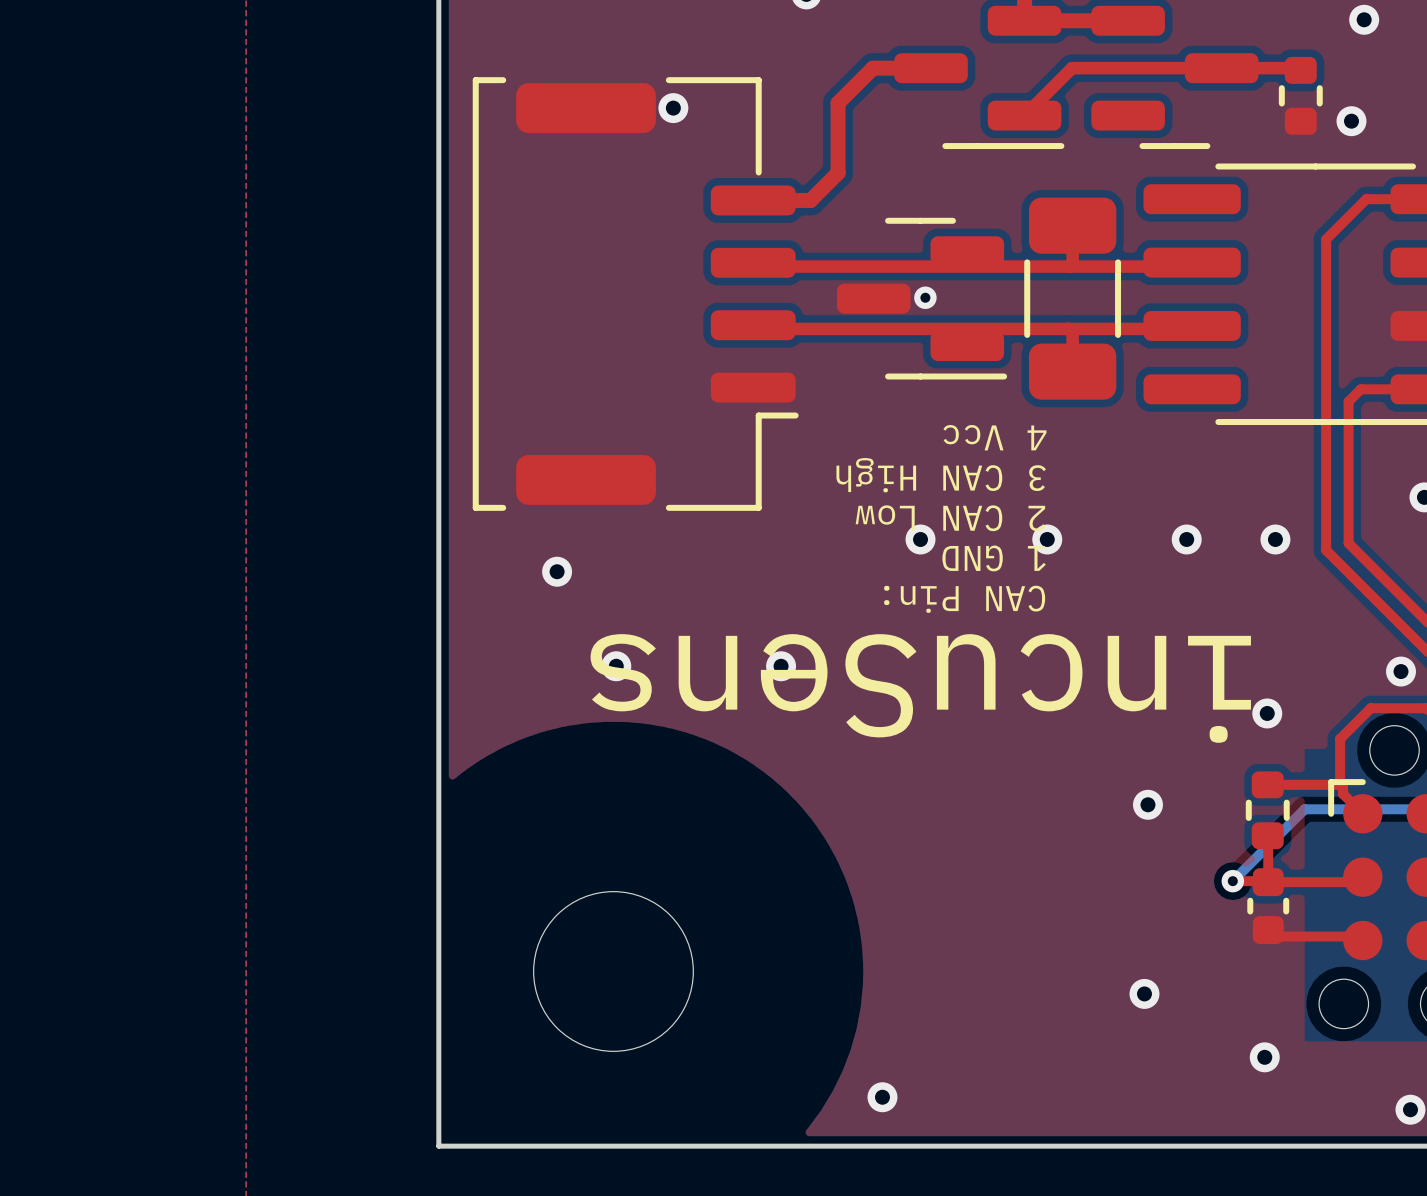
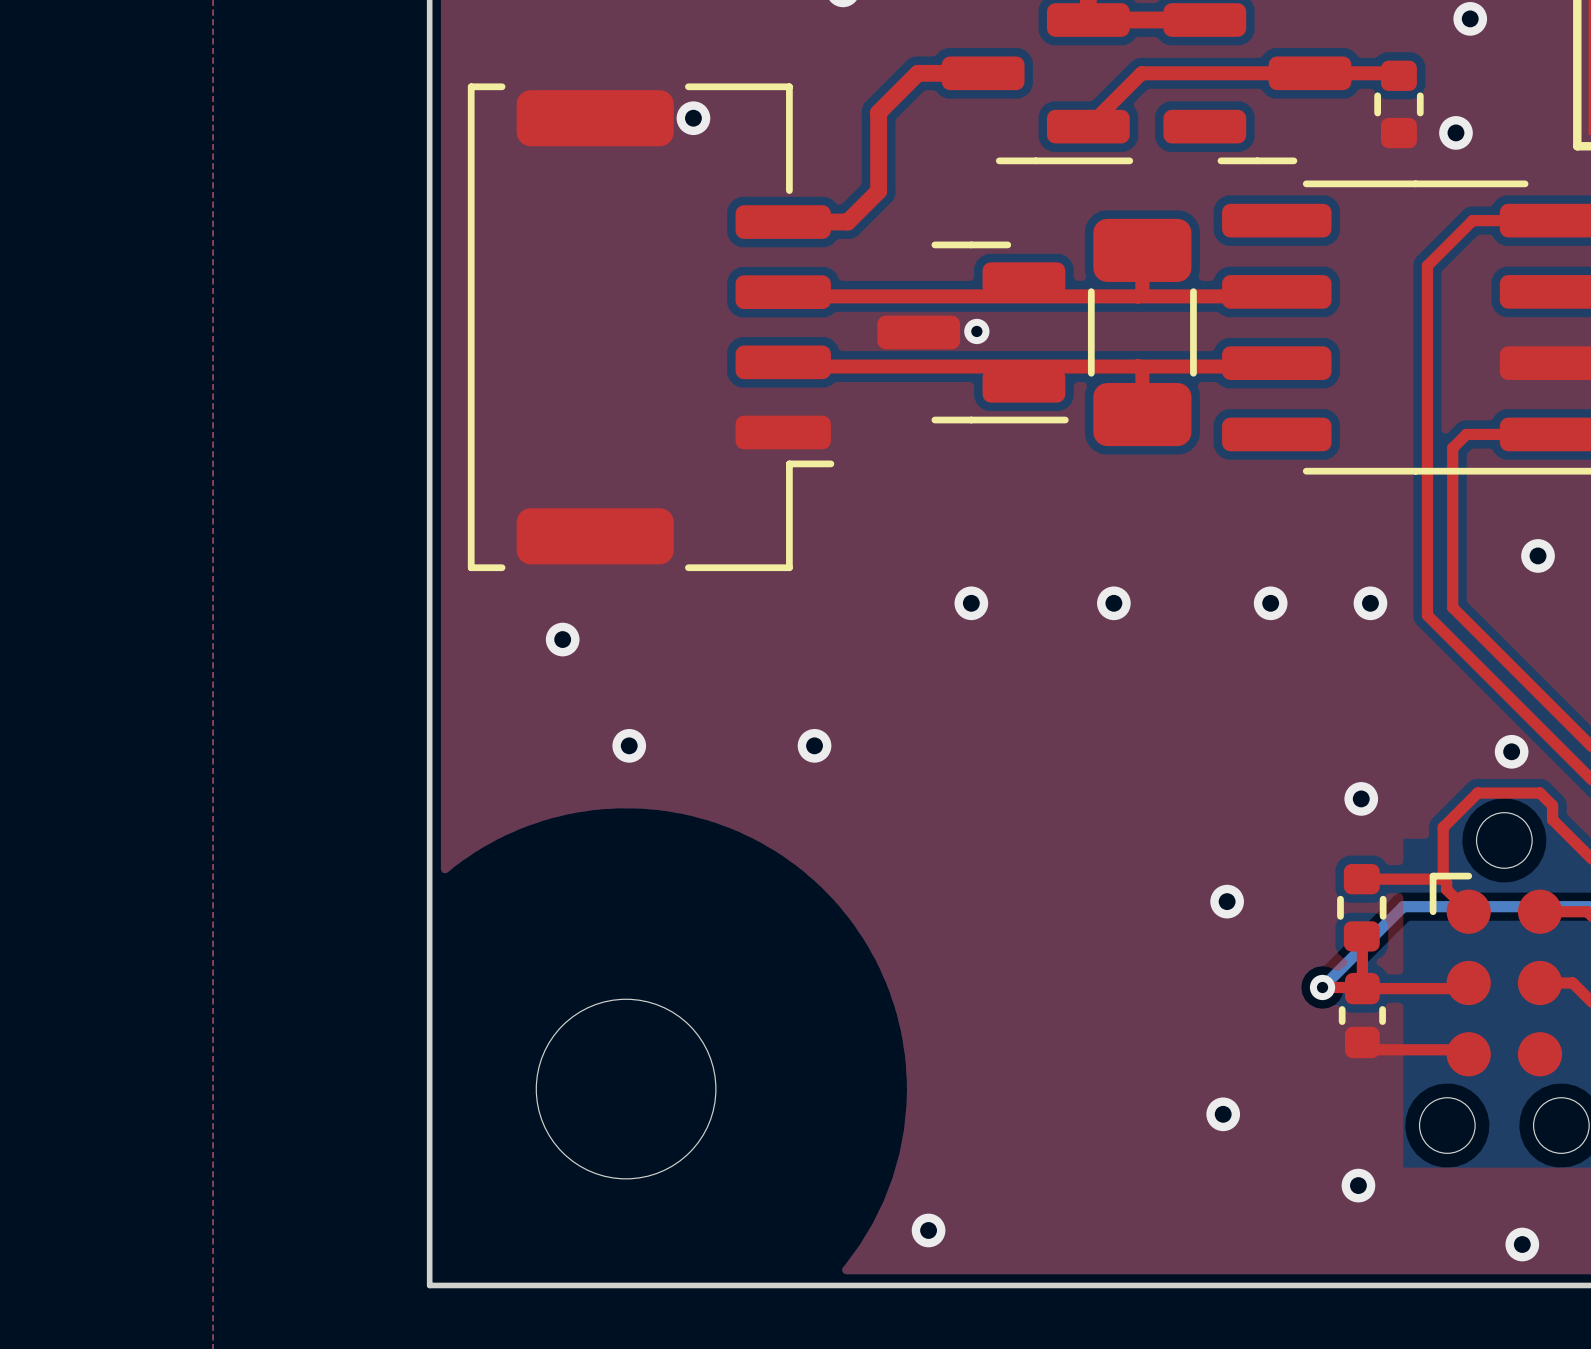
text: 4 Vcc (994, 437) -> none
text: 3 CAN High (941, 475) -> none
text: 2 CAN Low (950, 518) -> none
text: 1 GND (994, 558) -> none
text: CAN Pin: (964, 599) -> none
text: incuSens (920, 688) -> none

